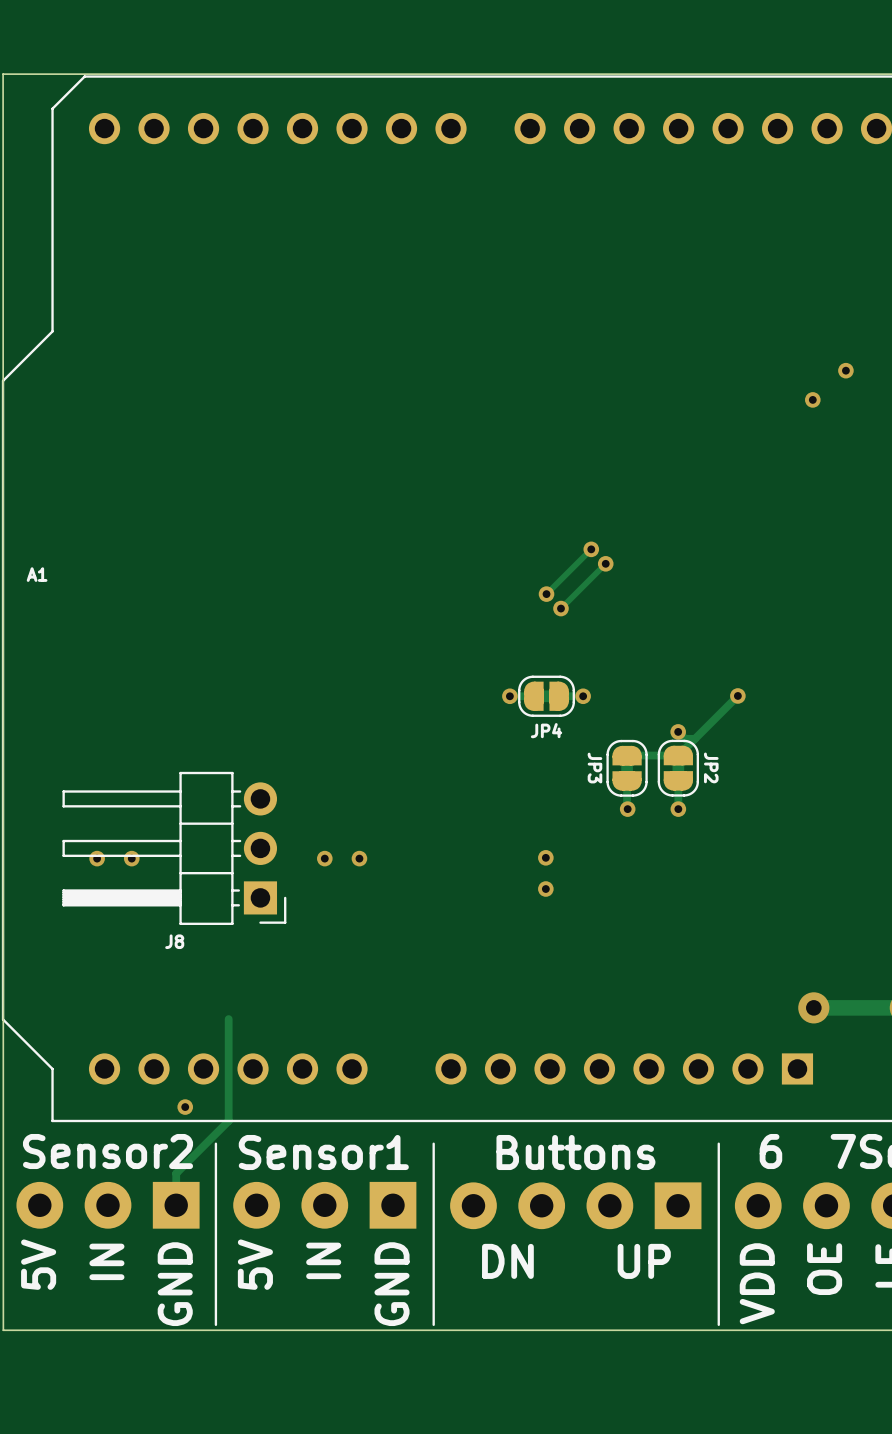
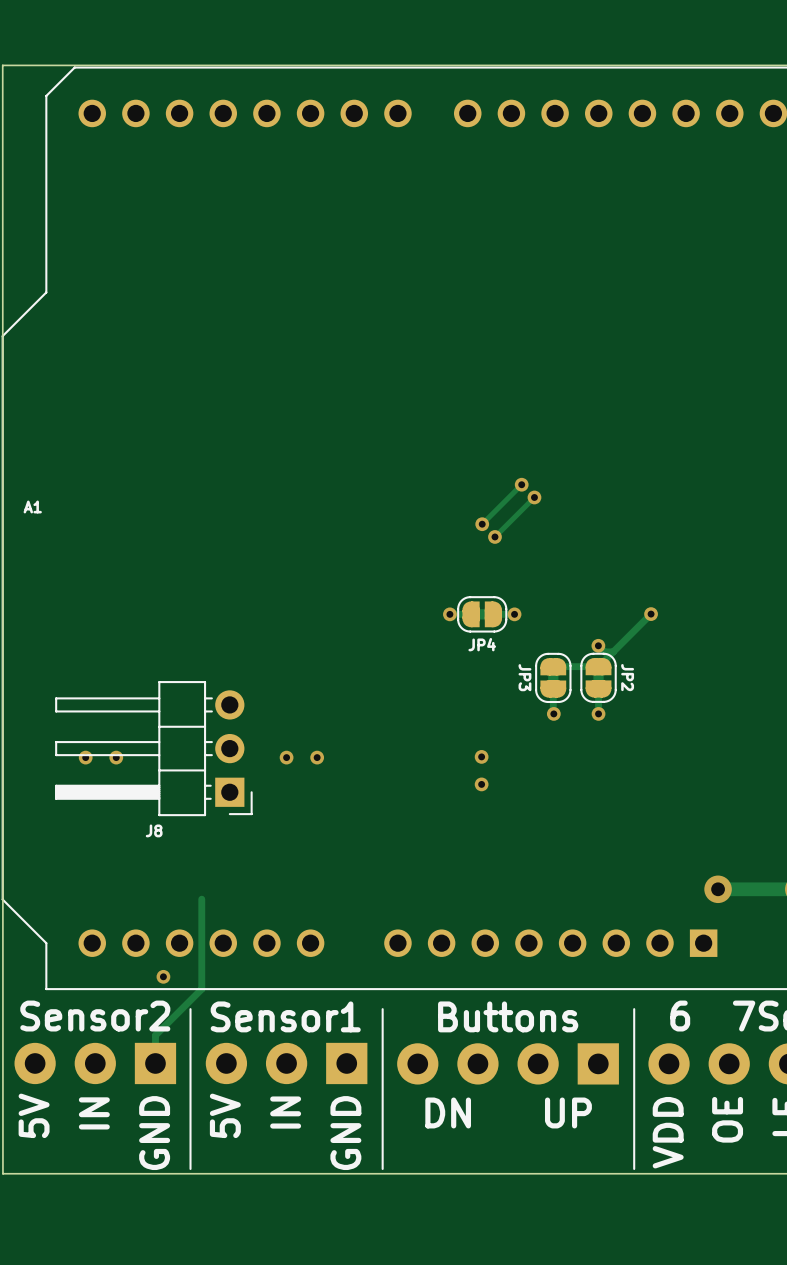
via: (845, 370) -> none
via: (812, 399) -> none

